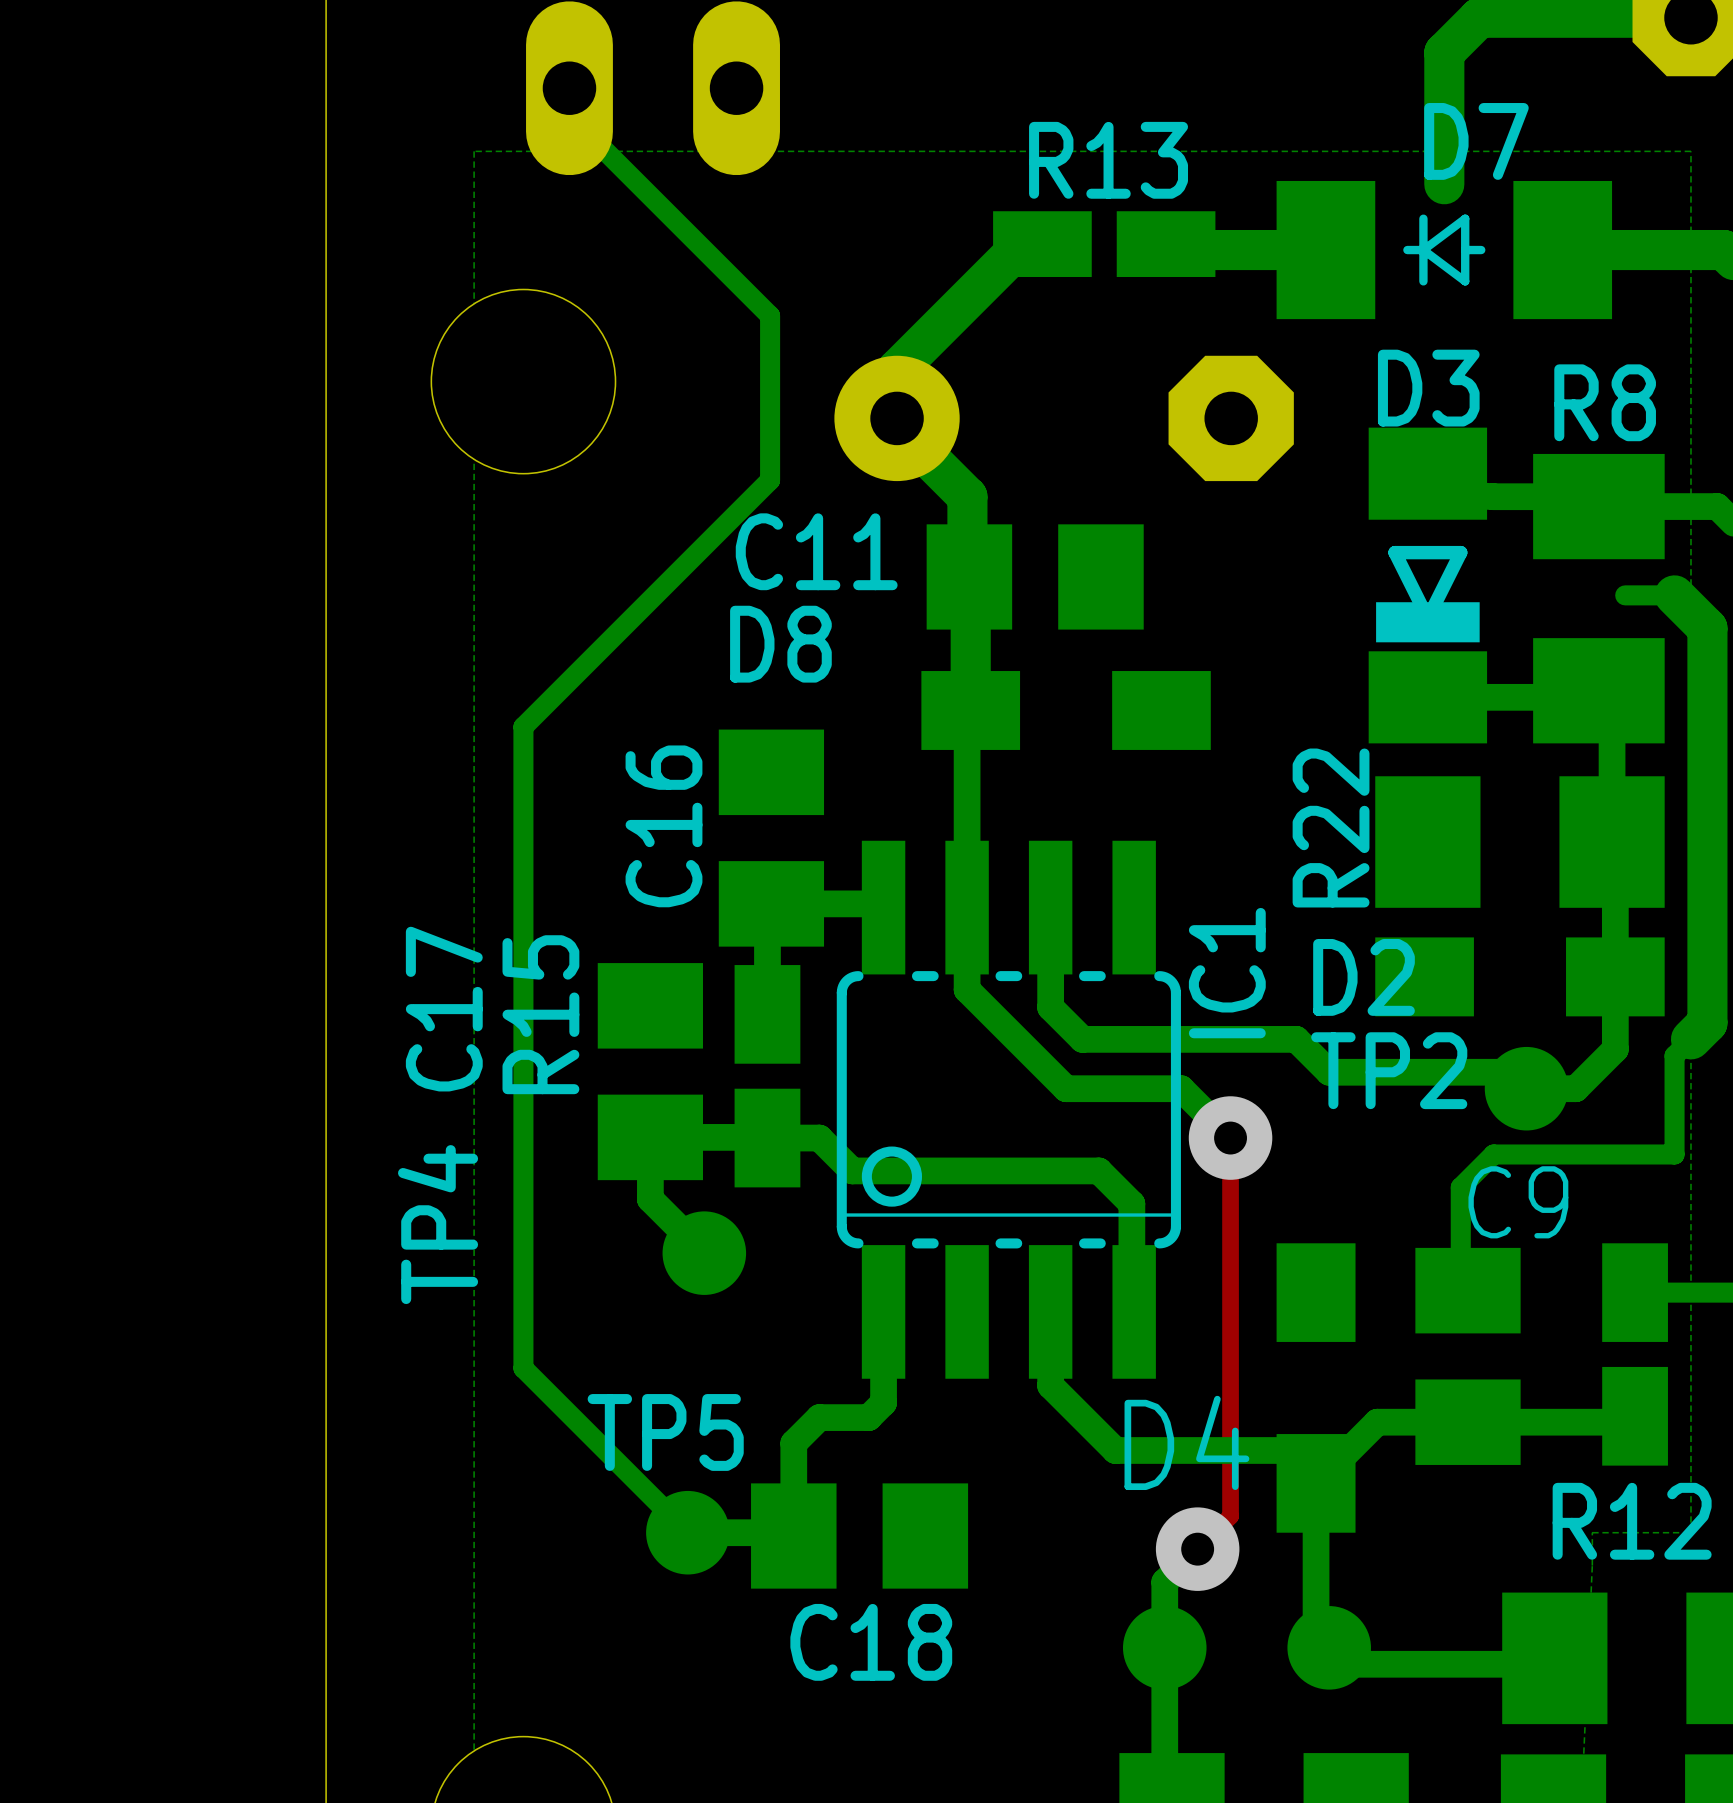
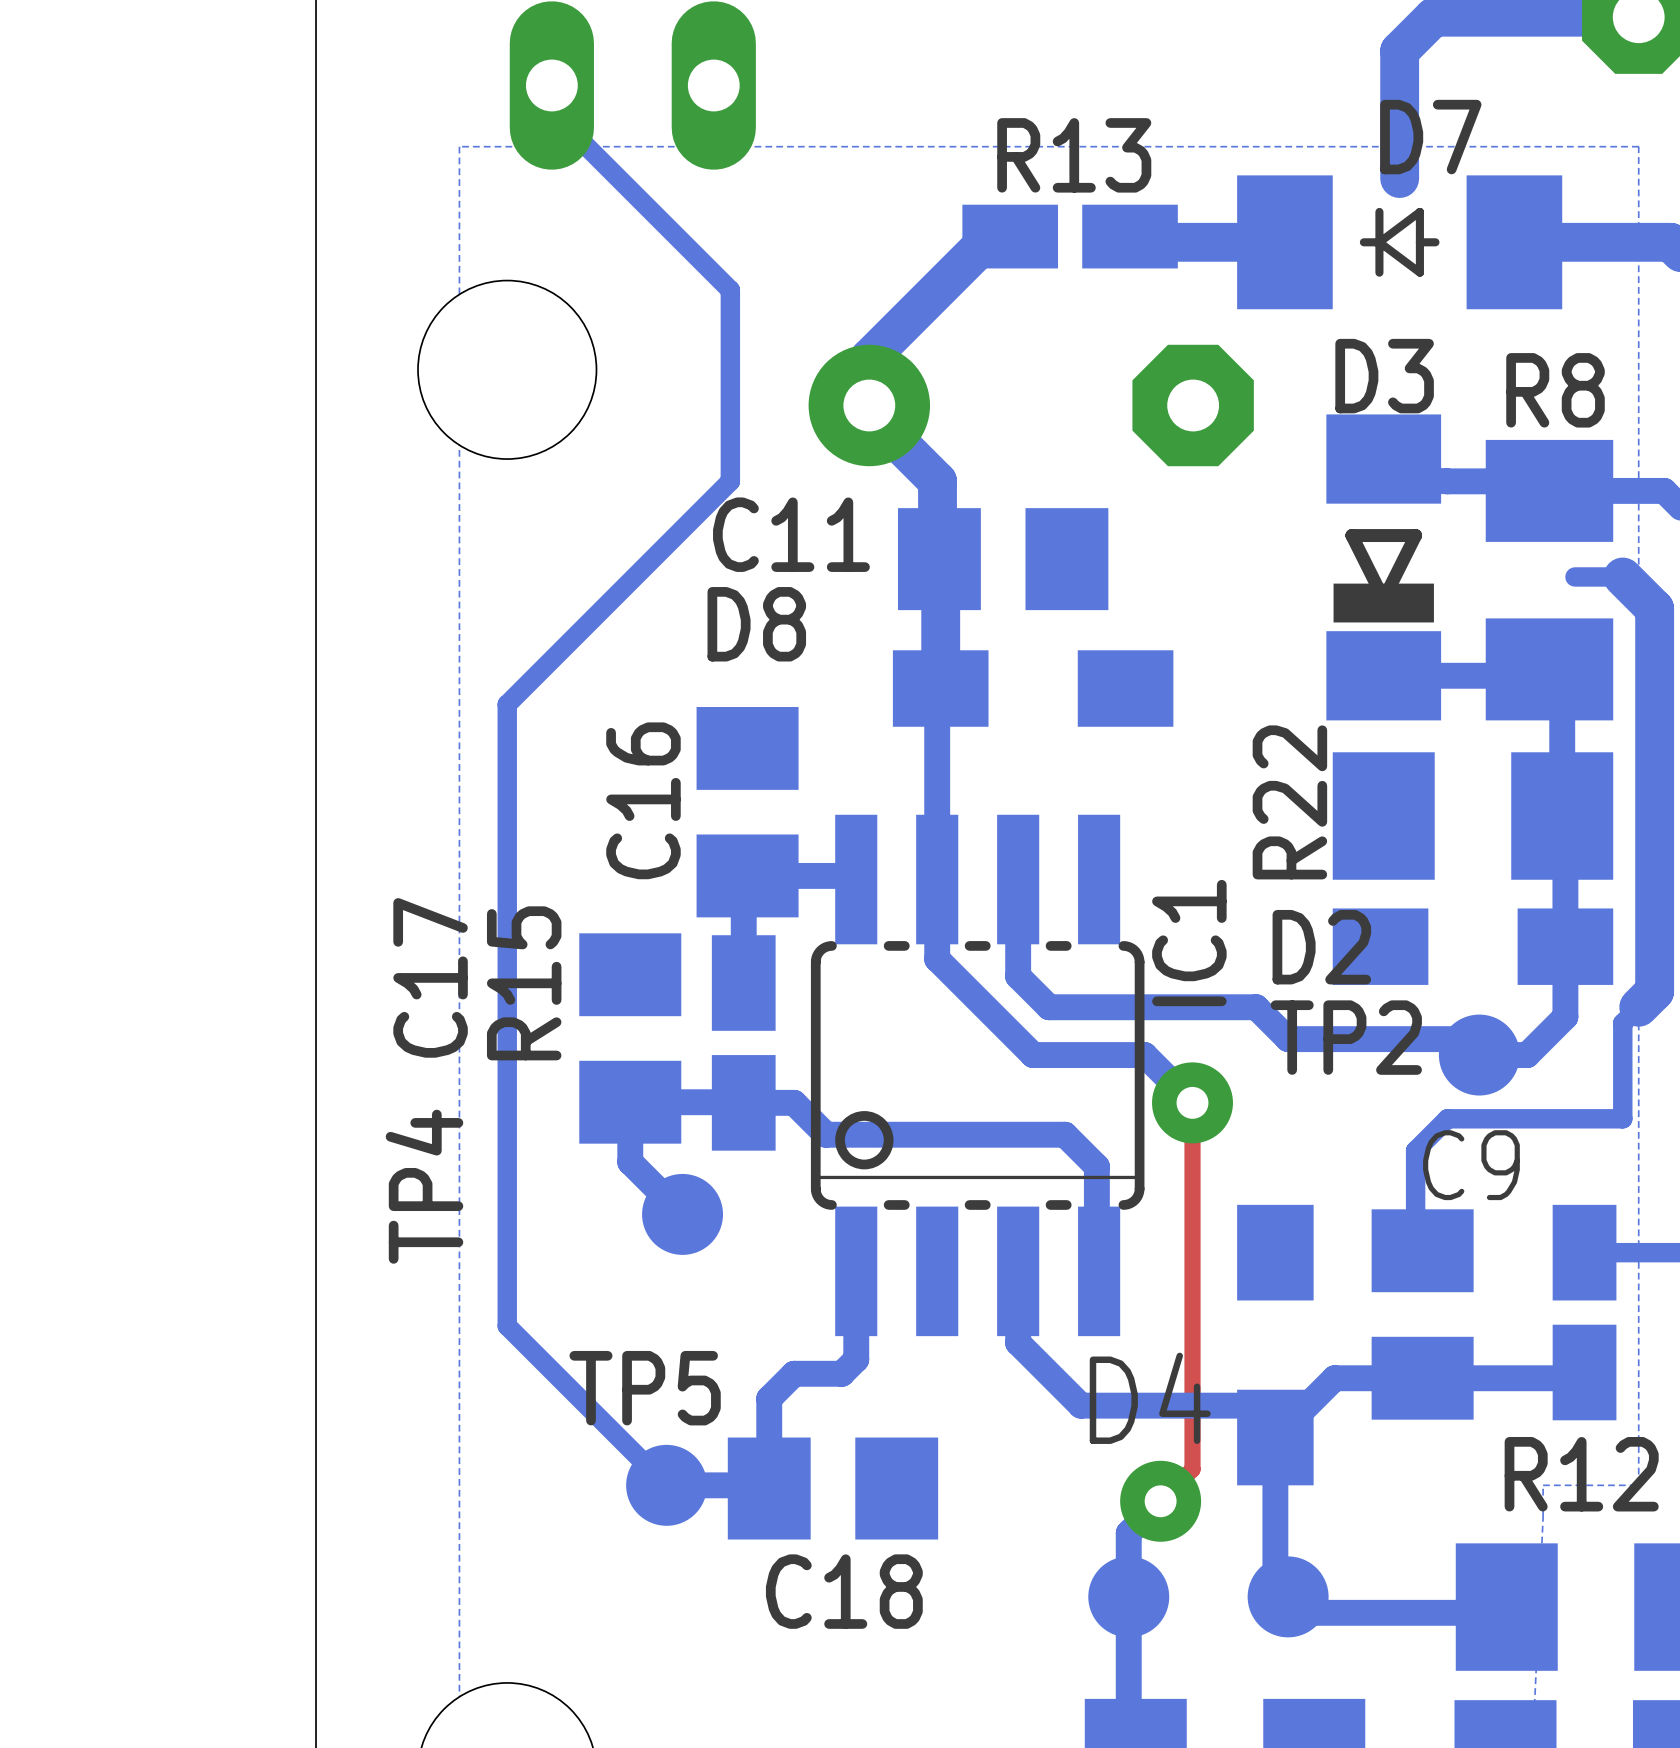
bottom track: (753, 299) (770, 315) (770, 480) (753, 496) -> (730, 290) (730, 481)

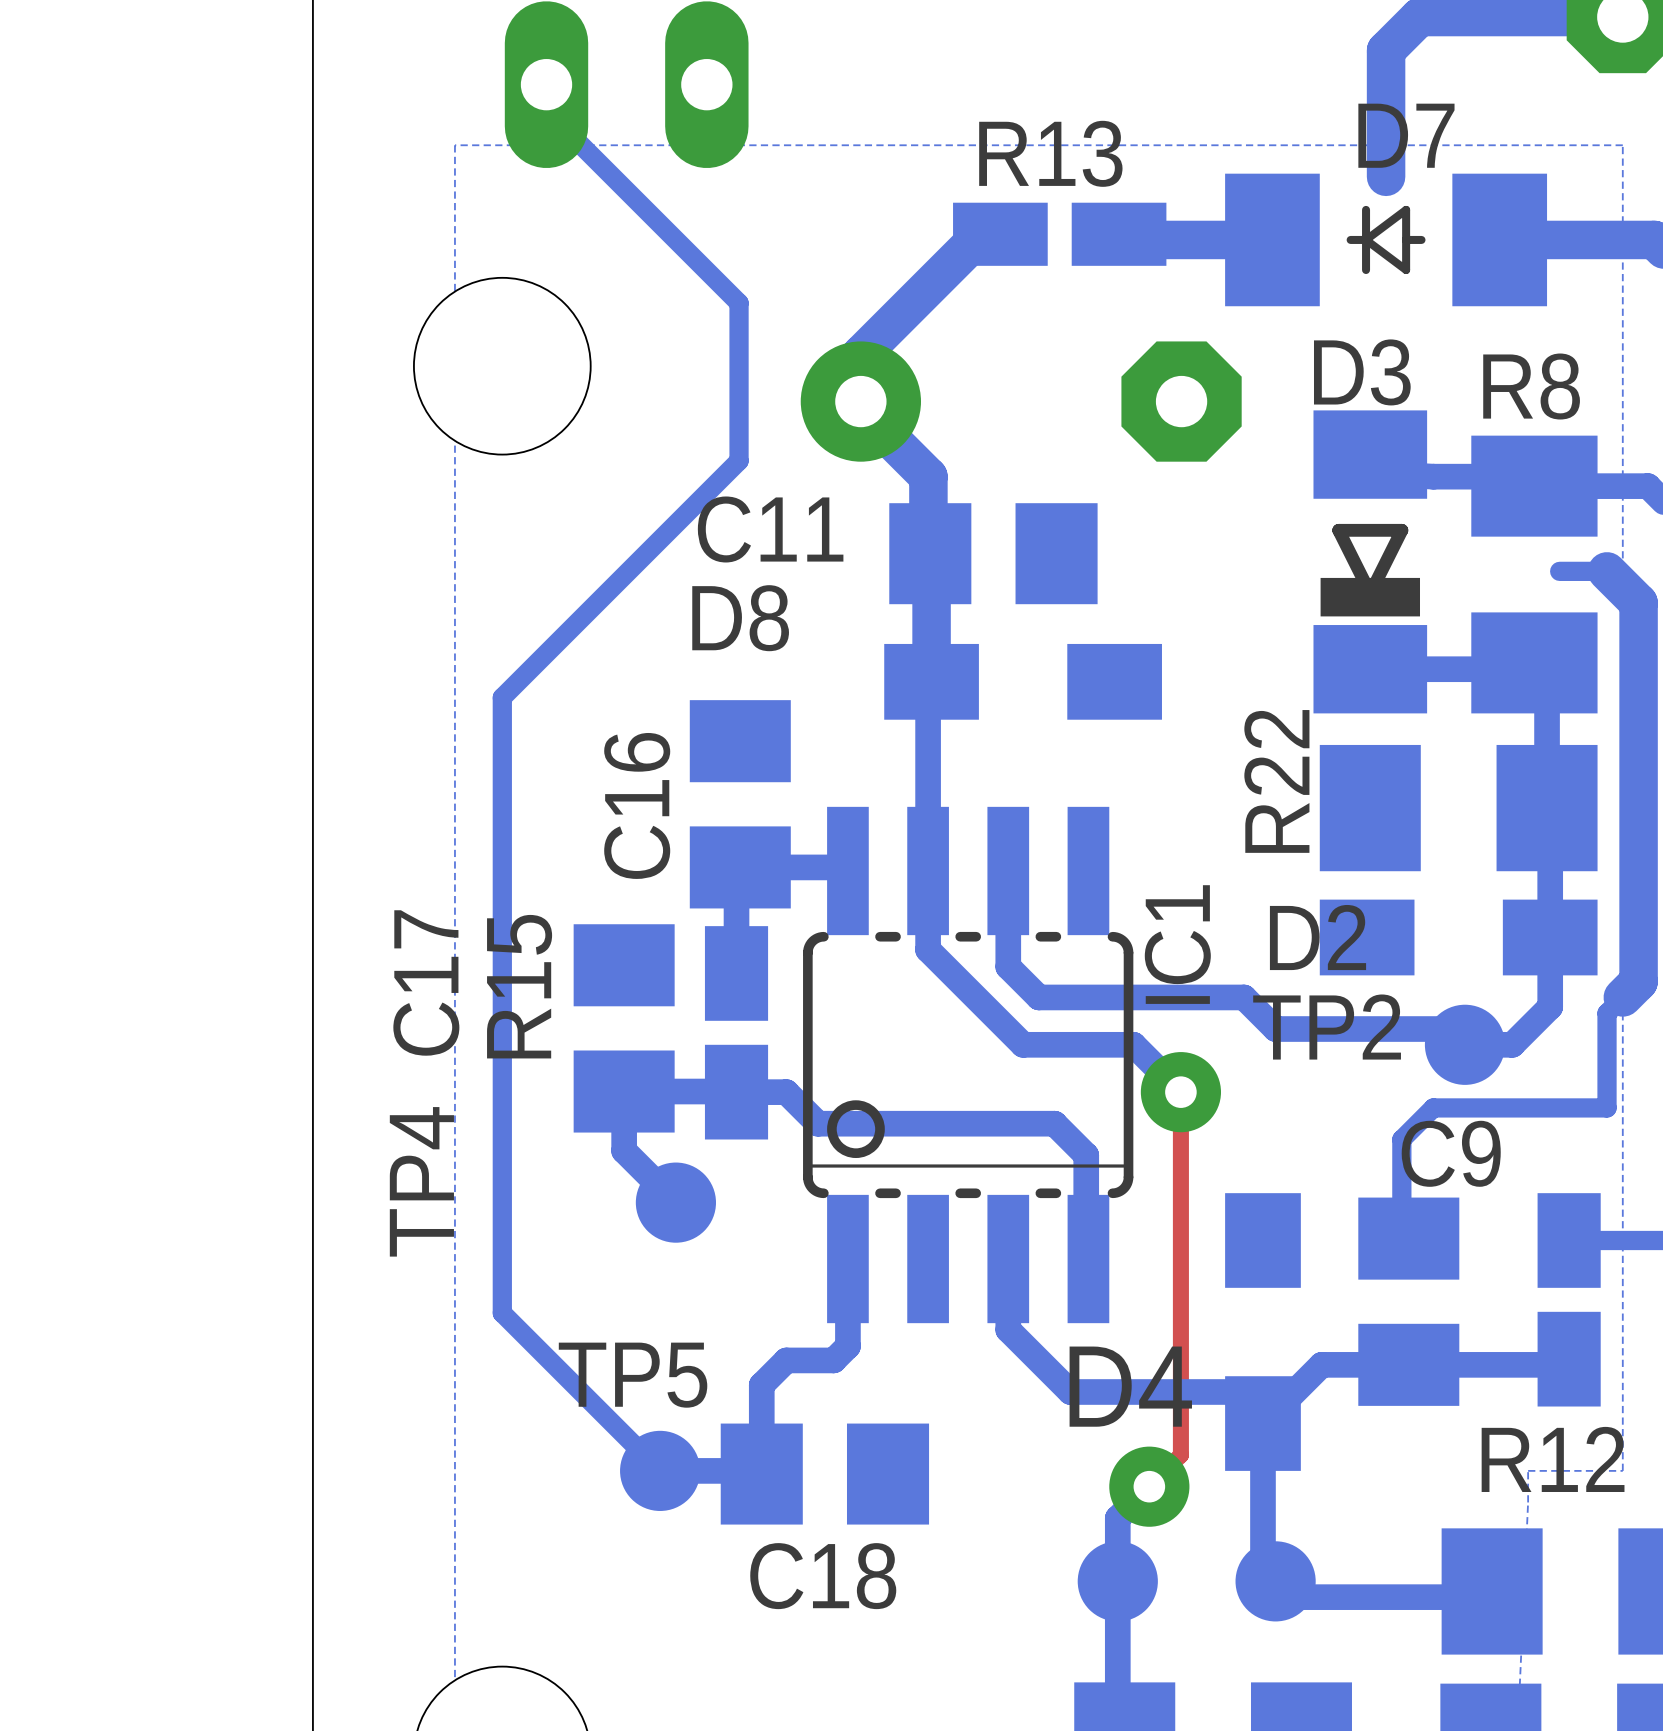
bottom track: (730, 290) (730, 481) -> (723, 287) (739, 303) (739, 460) (723, 476)

